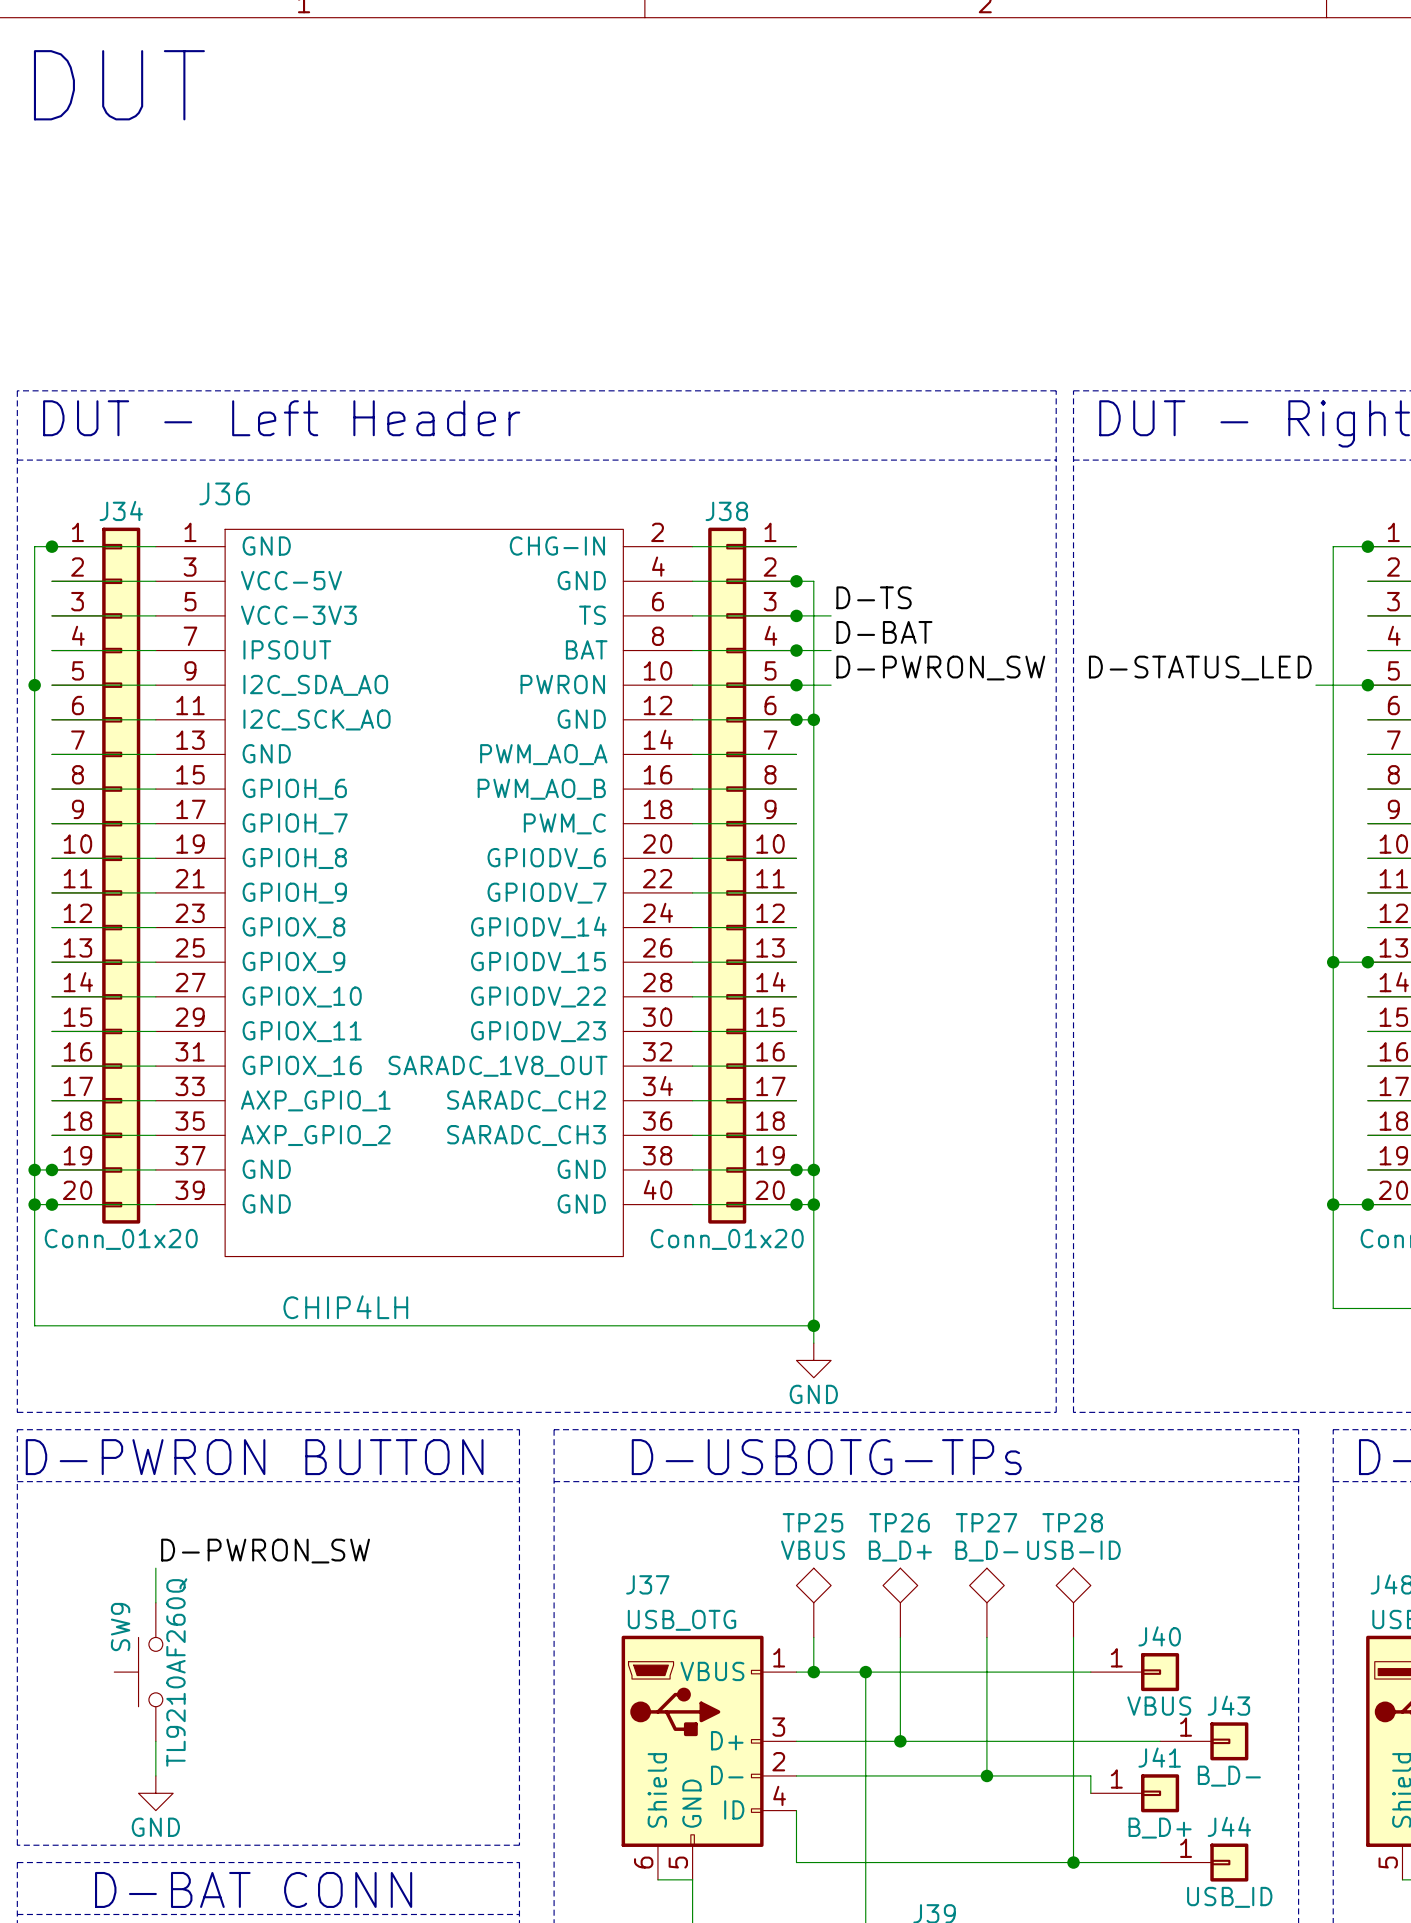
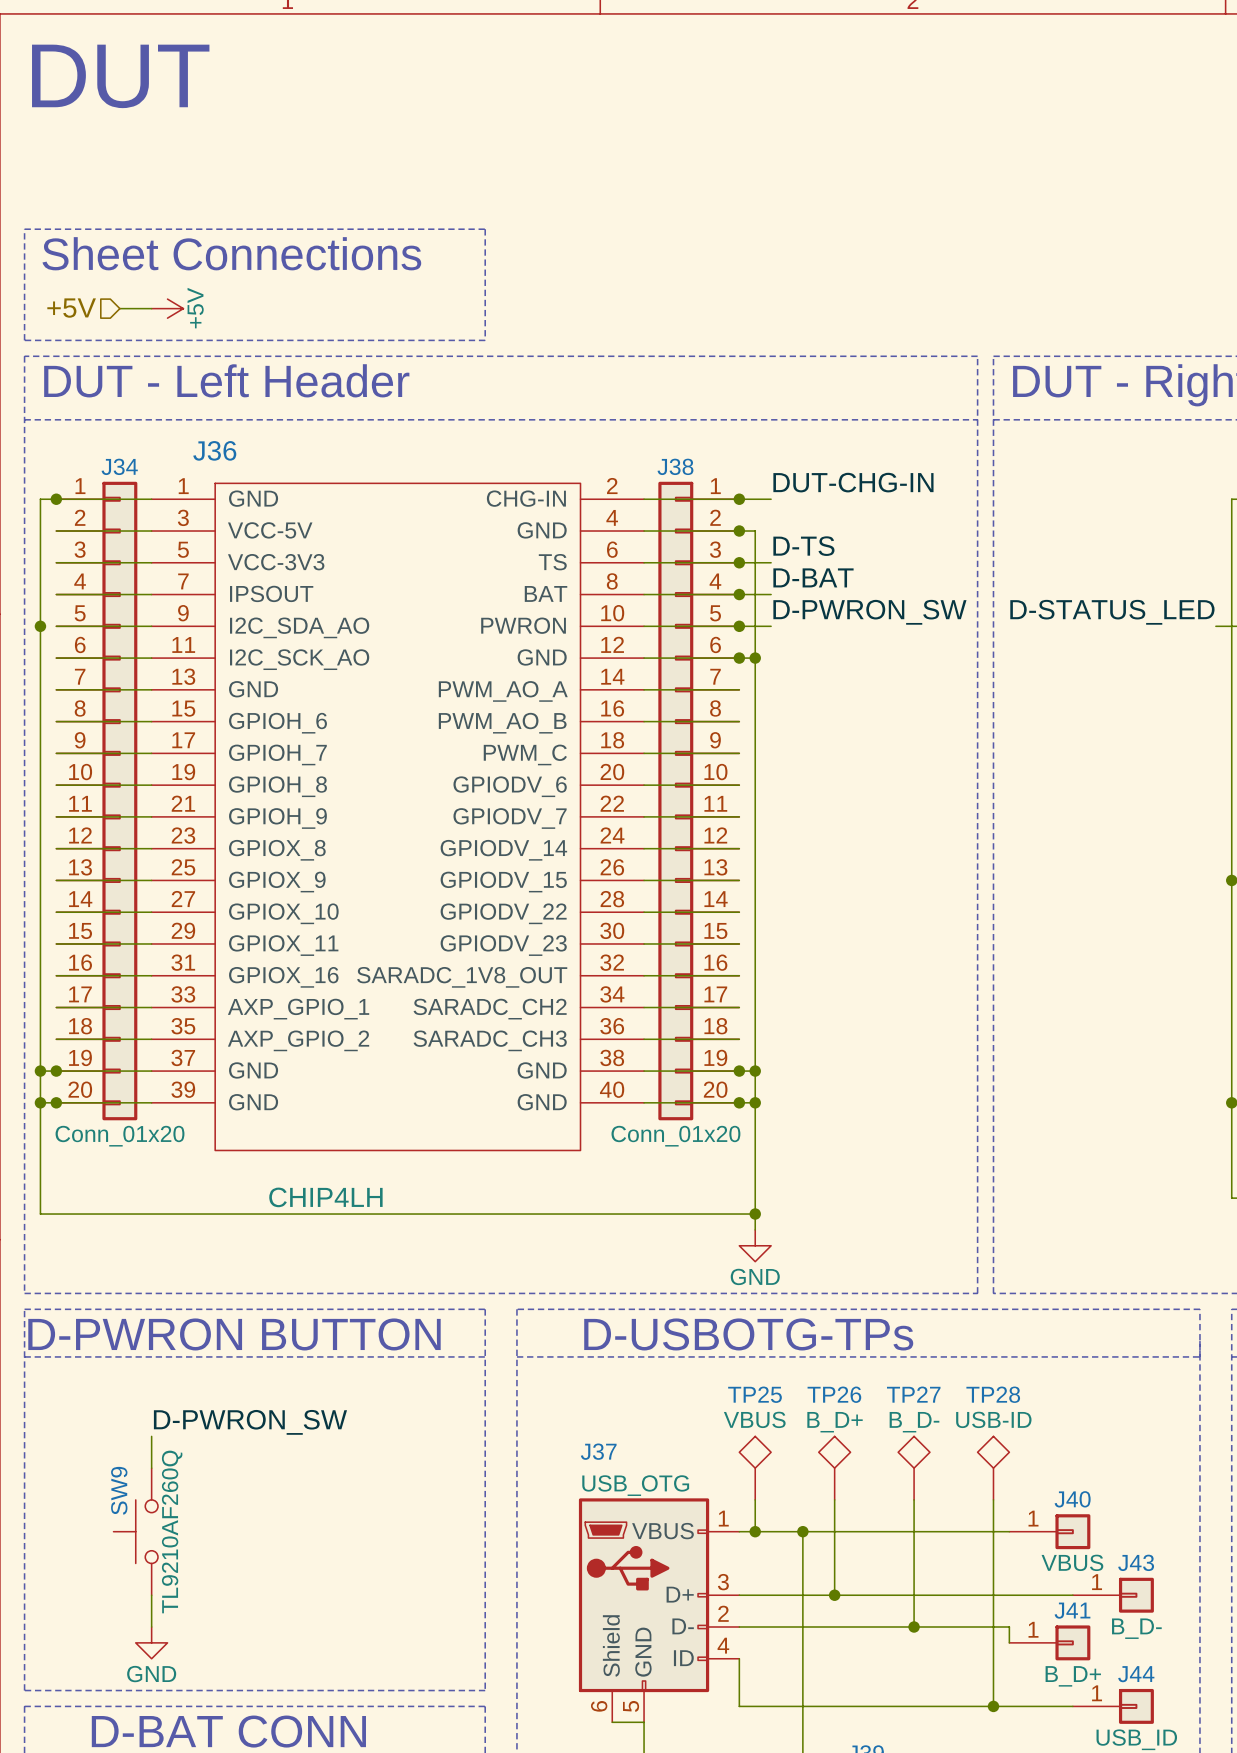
line: none -> (24, 229) (485, 229) (485, 340) (24, 340) (24, 229)
text: none -> Sheet Connections (231, 253)
hierarchical label: none -> +5V (71, 308)
wire: none -> (119, 308) (151, 308)
power symbol: none -> +5V (167, 308)
label: none -> DUT-CHG-IN (853, 482)
wire: none -> (739, 499) (771, 499)
junction: none -> (739, 499)

